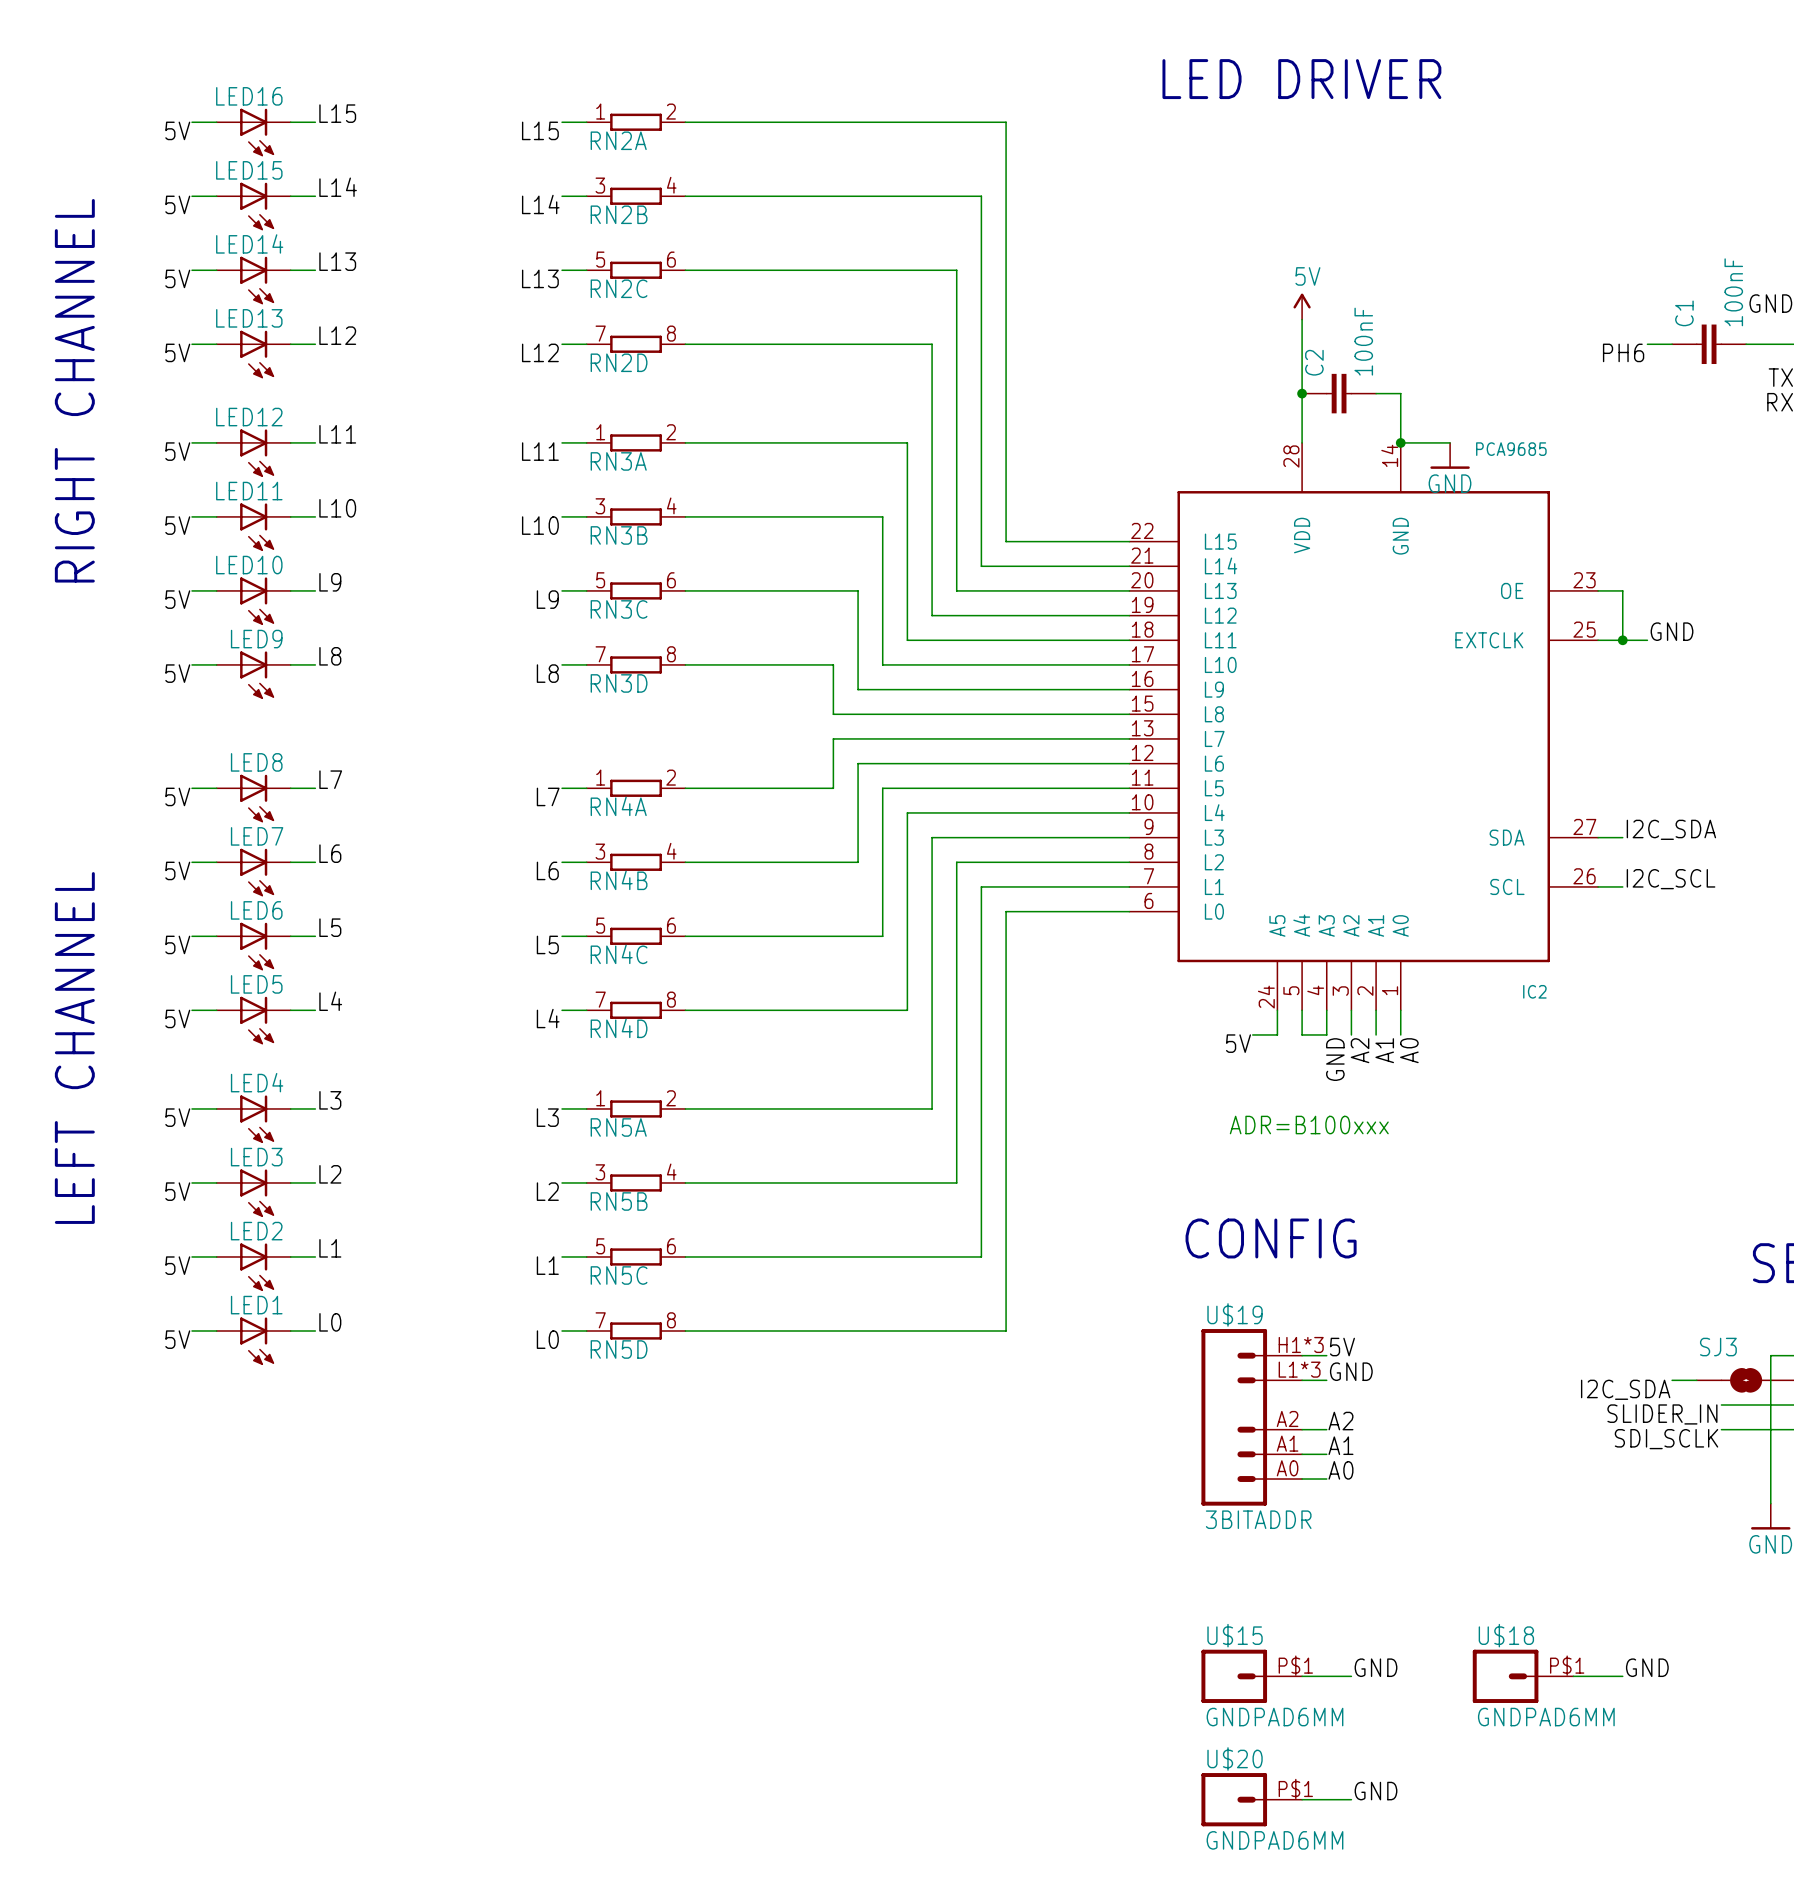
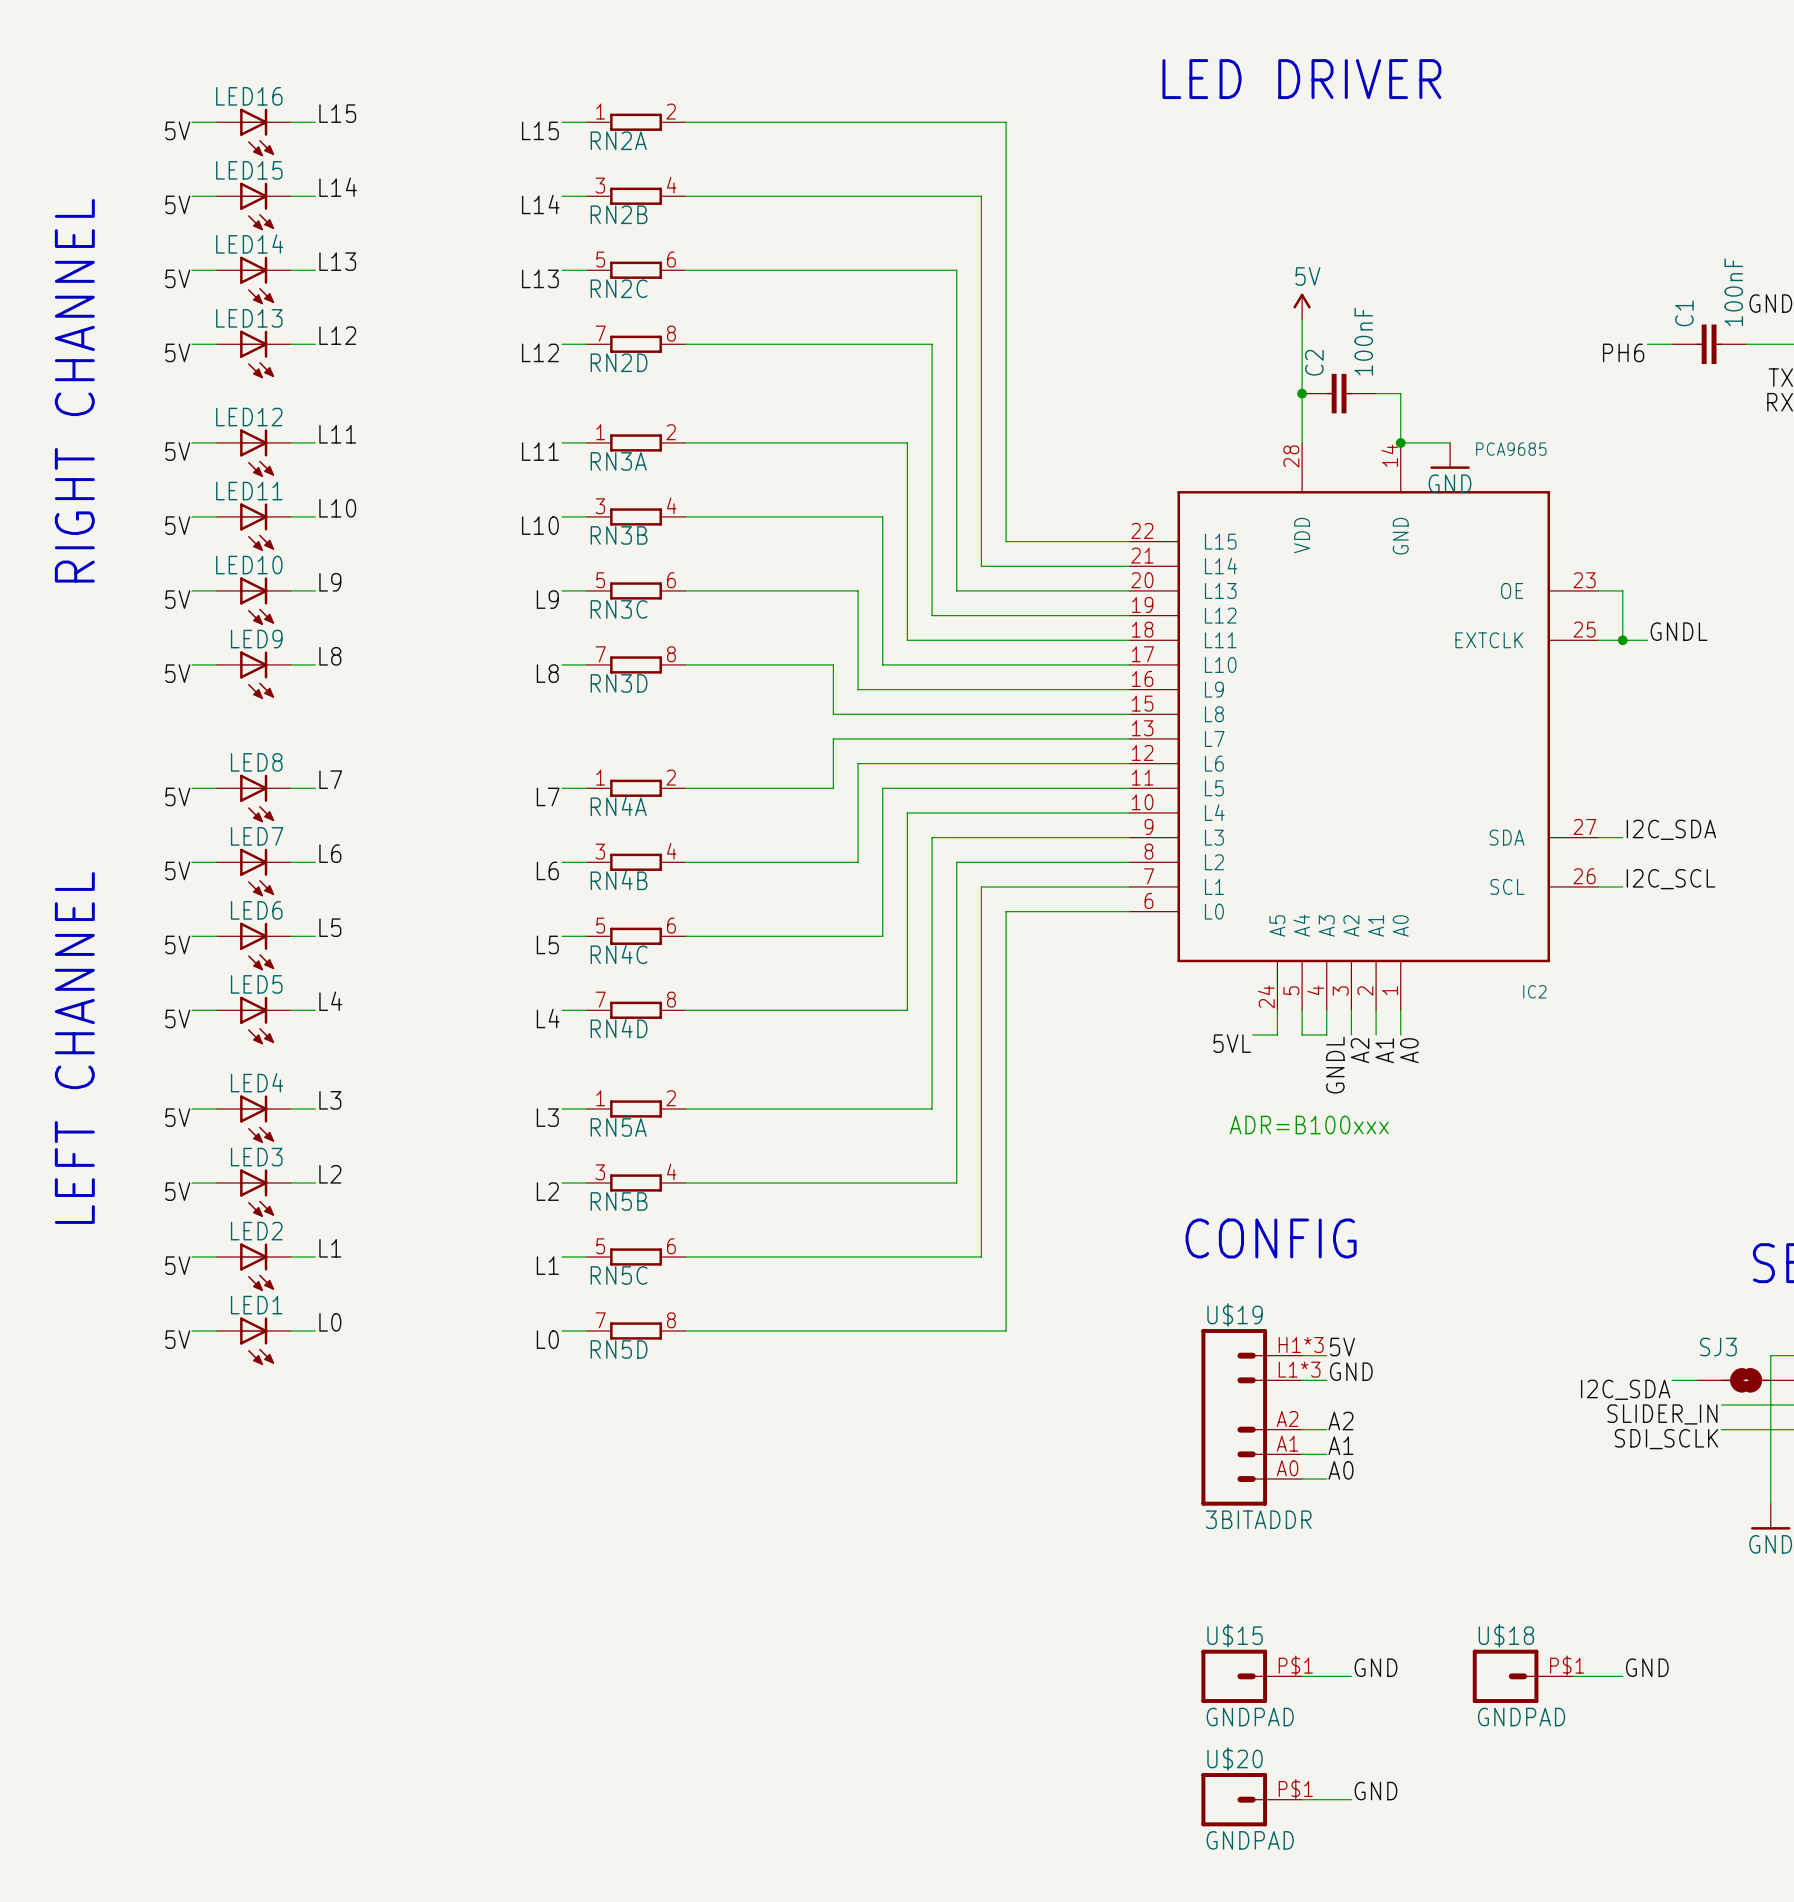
label: GND (1672, 631) -> GNDL (1679, 631)
label: 5V (1238, 1043) -> 5VL (1232, 1043)
label: GND (1335, 1059) -> GNDL (1335, 1065)
U$15 value: GNDPAD6MM (1274, 1717) -> GNDPAD (1250, 1717)
U$18 value: GNDPAD6MM (1546, 1717) -> GNDPAD (1521, 1717)
U$20 value: GNDPAD6MM (1274, 1840) -> GNDPAD (1250, 1840)

